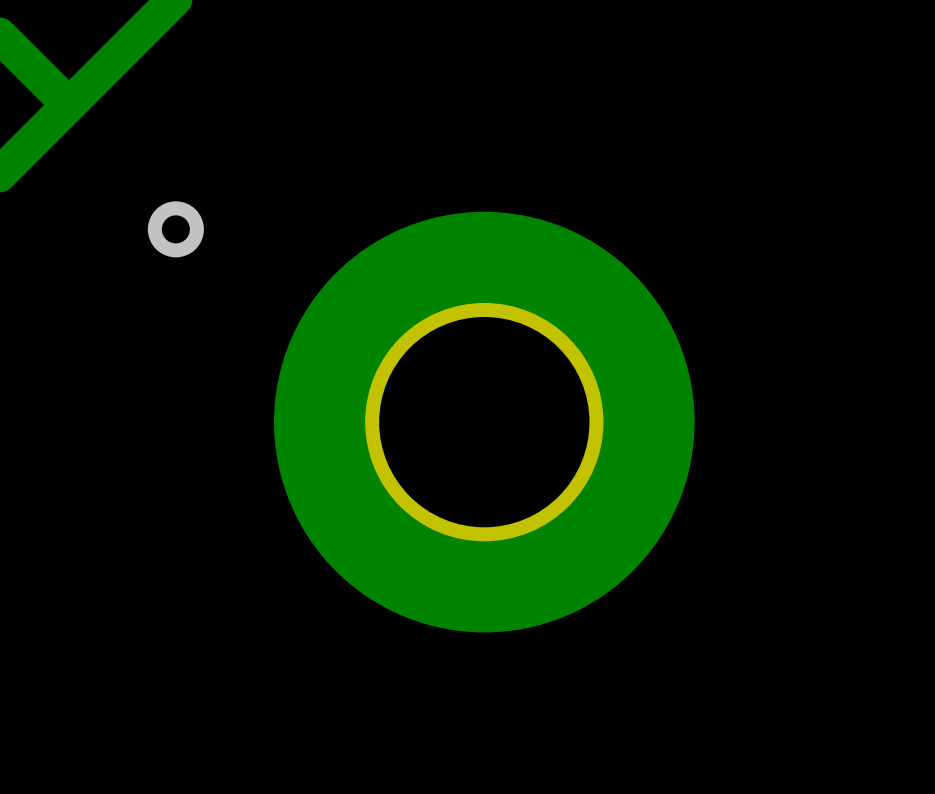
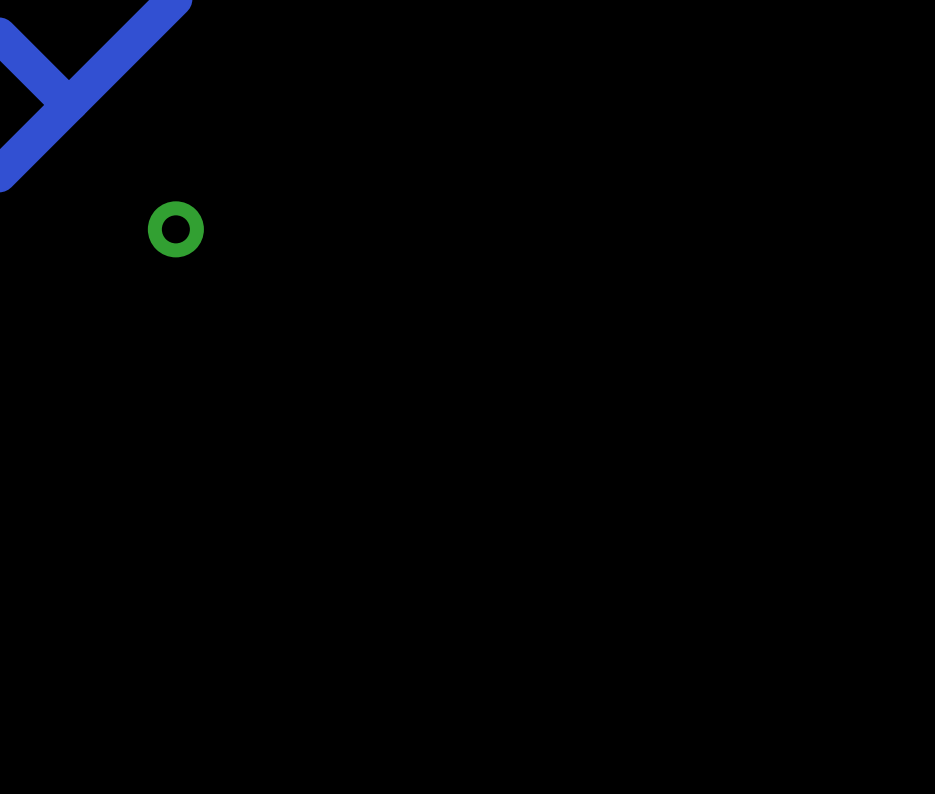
part: (484, 422) -> none

